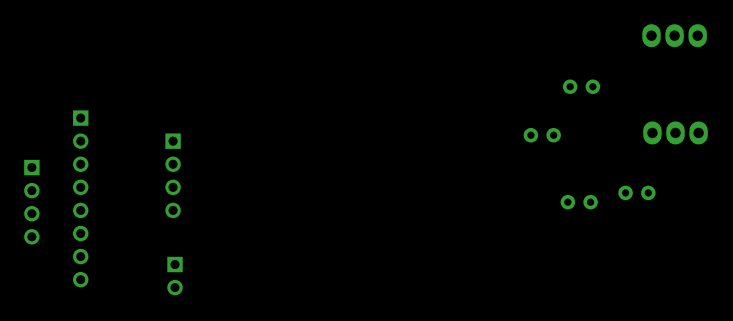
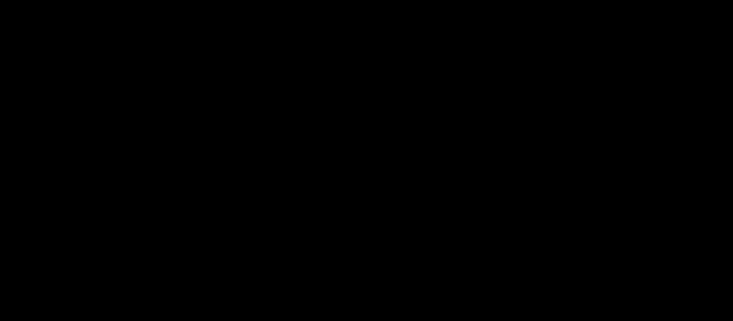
part: (674, 35) -> none
part: (581, 86) -> none
part: (675, 132) -> none
part: (542, 135) -> none
part: (173, 175) -> none
part: (636, 192) -> none
part: (80, 198) -> none
part: (31, 202) -> none
part: (579, 202) -> none
part: (175, 276) -> none

